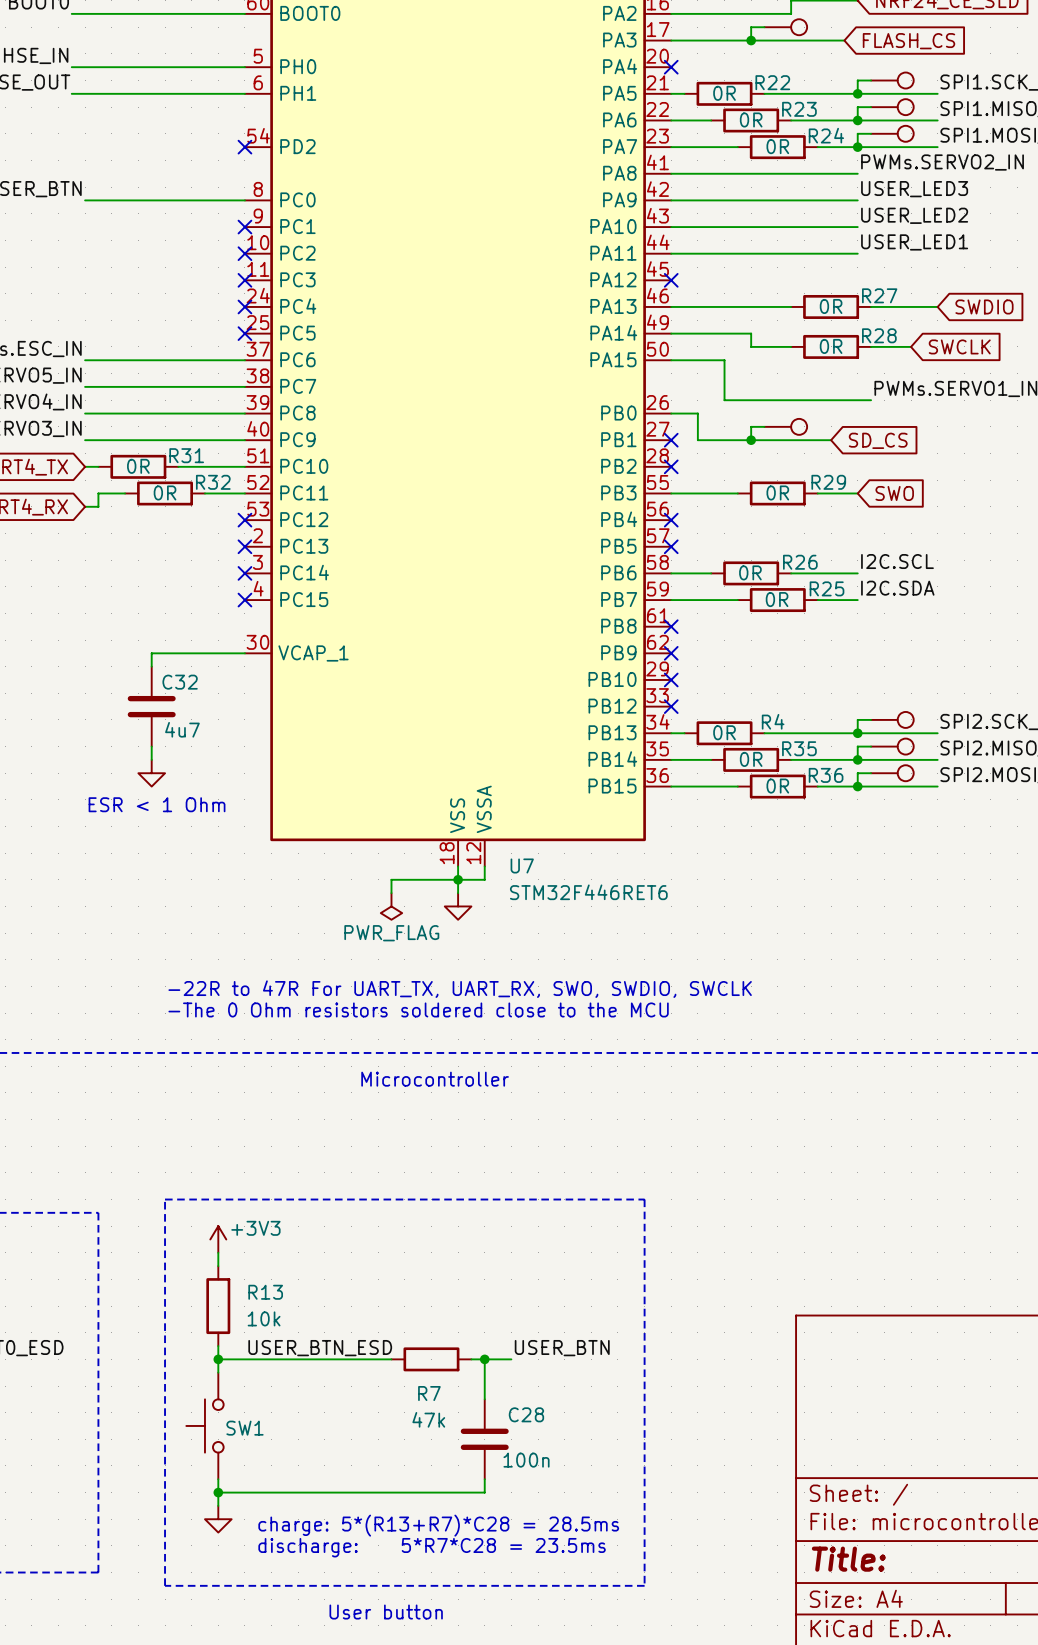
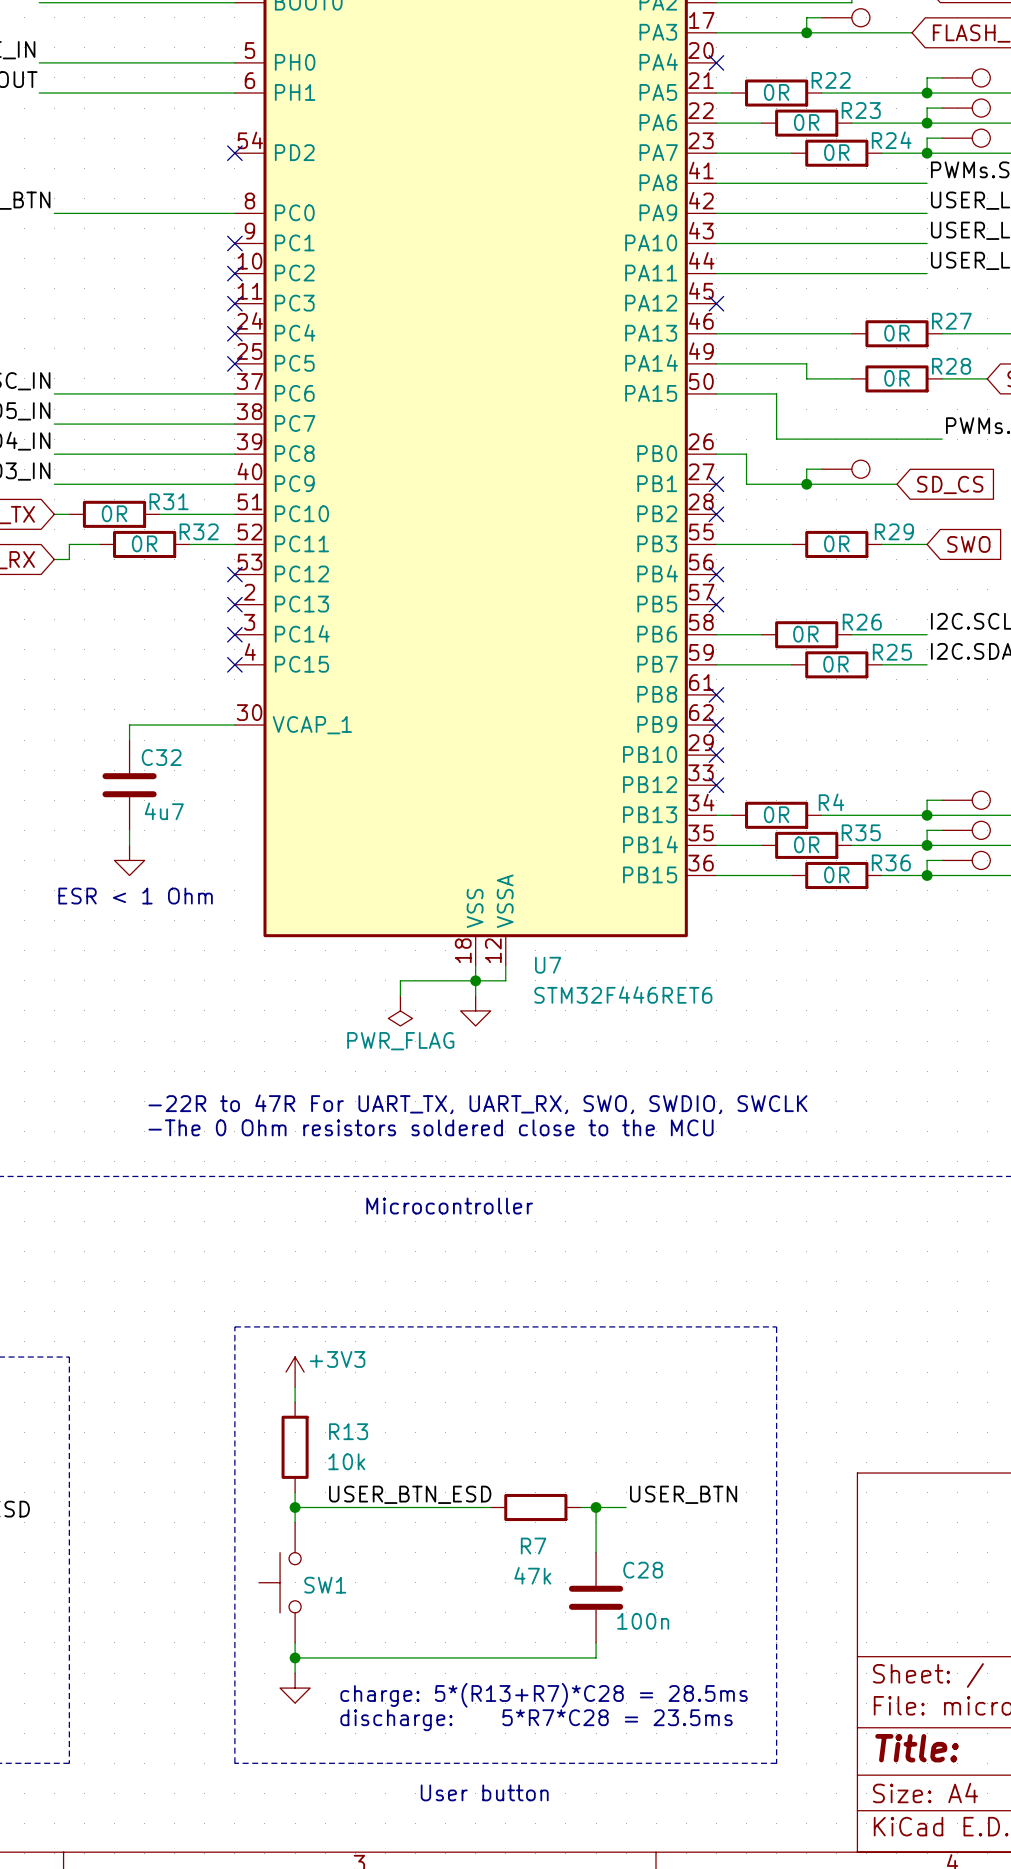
line: (165, 1199) (644, 1199) (644, 1585) (165, 1585) (165, 1199) -> (234, 1326) (776, 1326) (776, 1763) (234, 1763) (234, 1326)
power symbol position: +3V3 (218, 1239) -> +3V3 (295, 1372)
wire: (218, 1252) (218, 1266) -> (295, 1387) (295, 1402)
R13 position: (218, 1306) -> (295, 1447)
wire: (218, 1346) (218, 1372) -> (295, 1492) (295, 1522)
junction: none -> (295, 1507)
junction: none -> (596, 1507)
label position: USER_BTN_ESD (320, 1348) -> USER_BTN_ESD (410, 1494)
label position: USER_BTN (562, 1348) -> USER_BTN (683, 1494)
wire: (218, 1359) (391, 1359) -> (295, 1507) (490, 1507)
junction: (218, 1359) -> none
R7 position: (431, 1359) -> (535, 1507)
wire: (471, 1359) (511, 1359) -> (580, 1507) (626, 1507)
wire: (484, 1359) (484, 1399) -> (596, 1507) (596, 1552)
junction: (484, 1359) -> none
SW1 position: (204, 1425) -> (280, 1582)
C28 position: (484, 1439) -> (596, 1597)
wire: (218, 1479) (218, 1505) -> (295, 1642) (295, 1673)
junction: none -> (295, 1657)
wire: (484, 1479) (484, 1492) (218, 1492) -> (596, 1642) (596, 1657) (295, 1657)
junction: (218, 1492) -> none
power symbol position: (218, 1519) -> (295, 1688)
text position: charge: 5*(R13+R7)*C28 = 28.5ms (438, 1525) -> charge: 5*(R13+R7)*C28 = 28.5ms (544, 1695)
text position: discharge: 5*R7*C28 = 23.5ms (432, 1547) -> discharge: 5*R7*C28 = 23.5ms (536, 1720)
text position: User button (386, 1612) -> User button (484, 1792)

